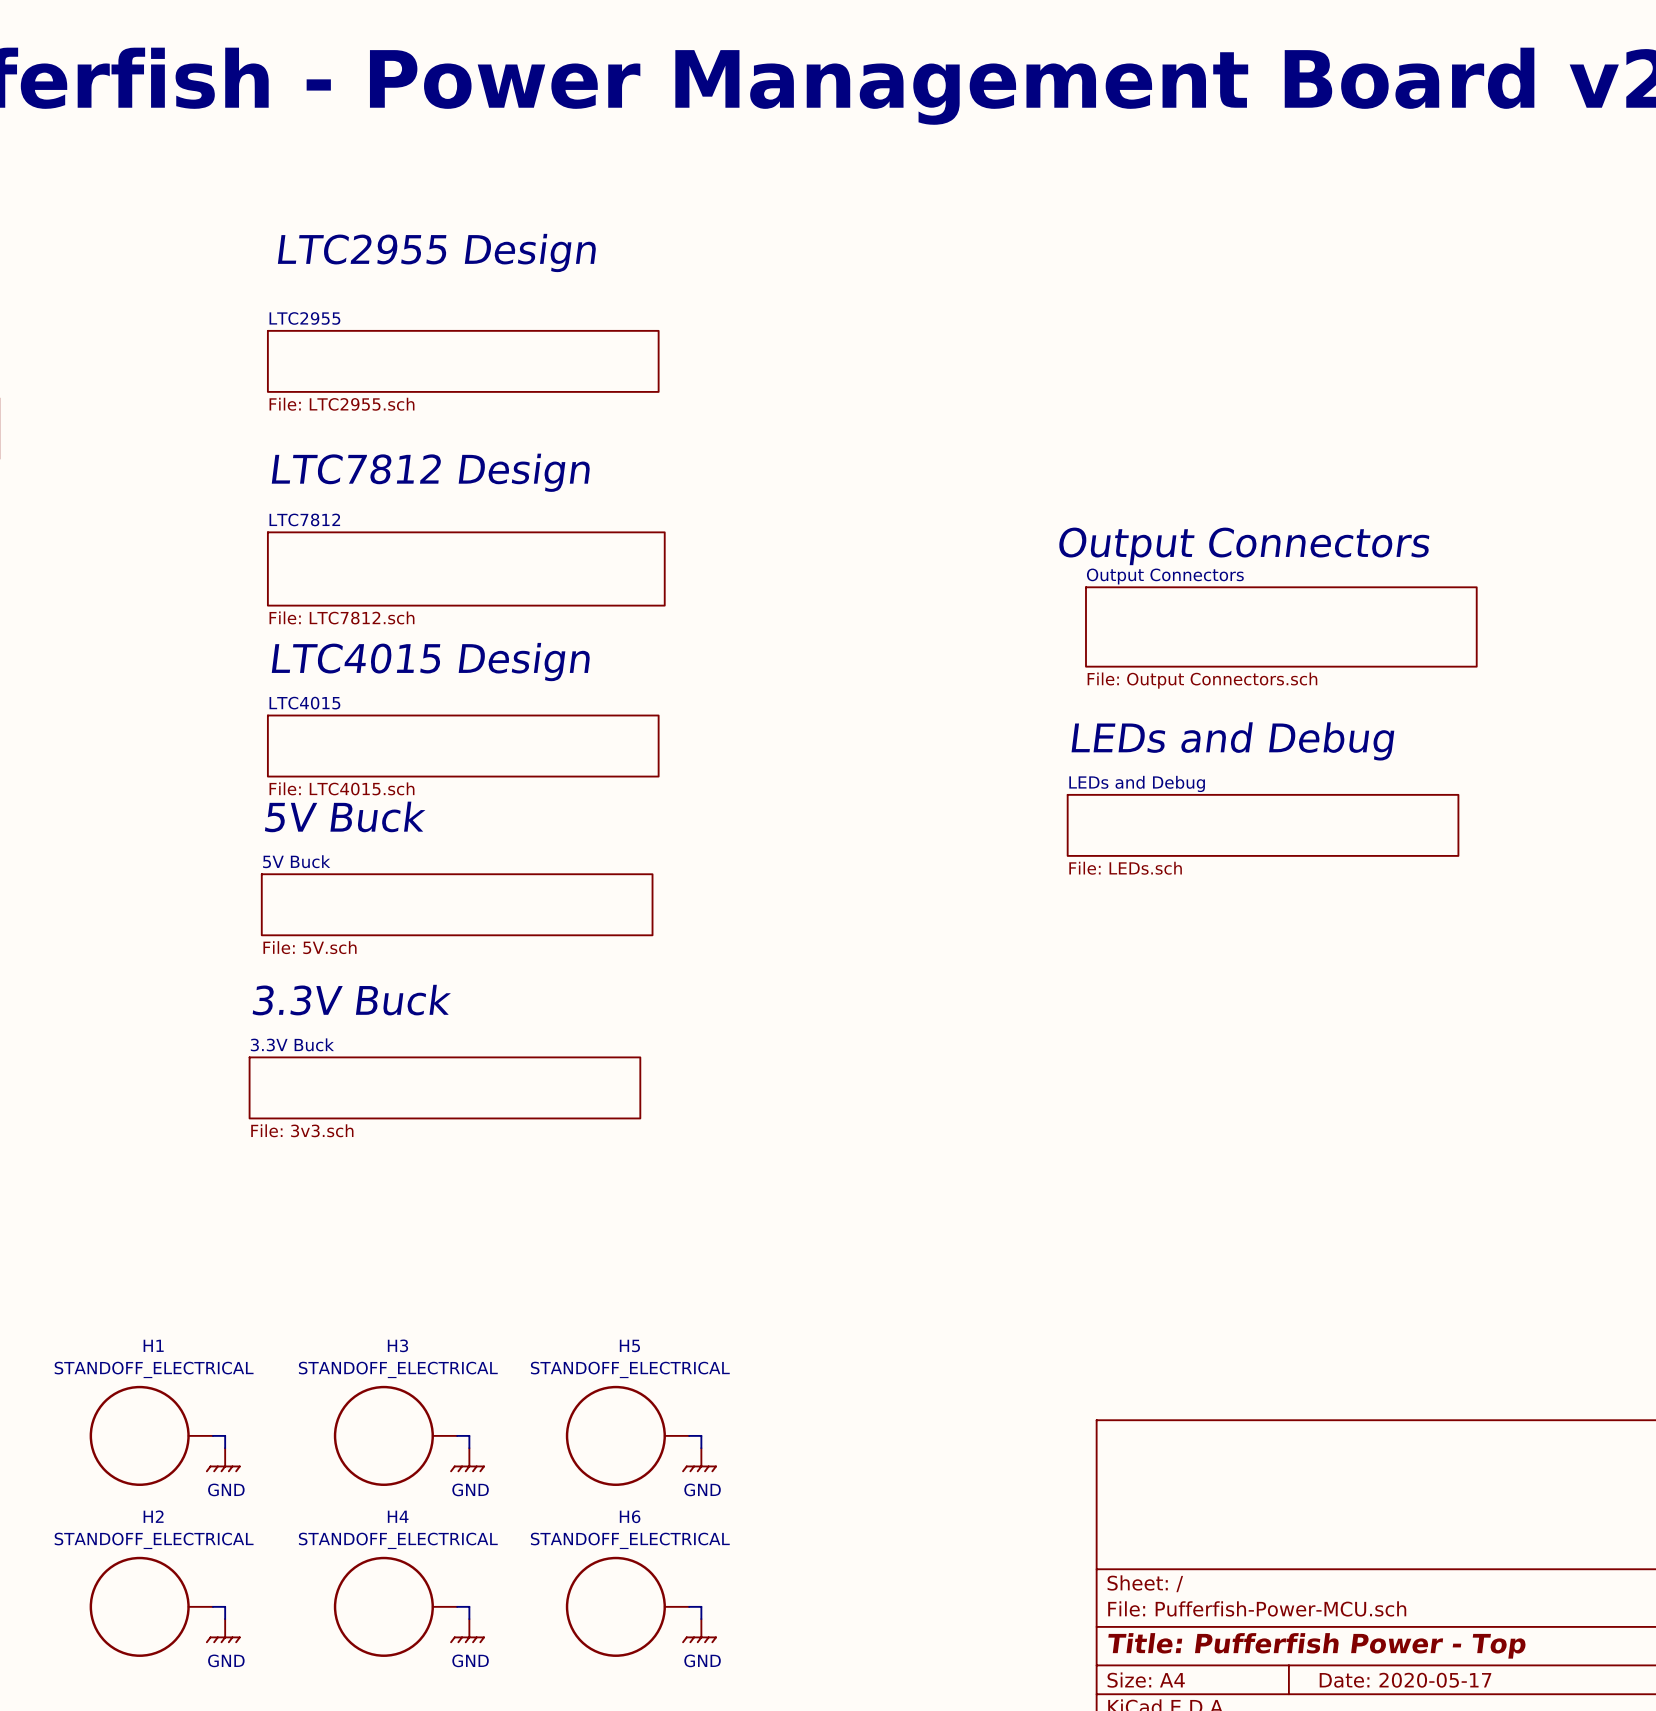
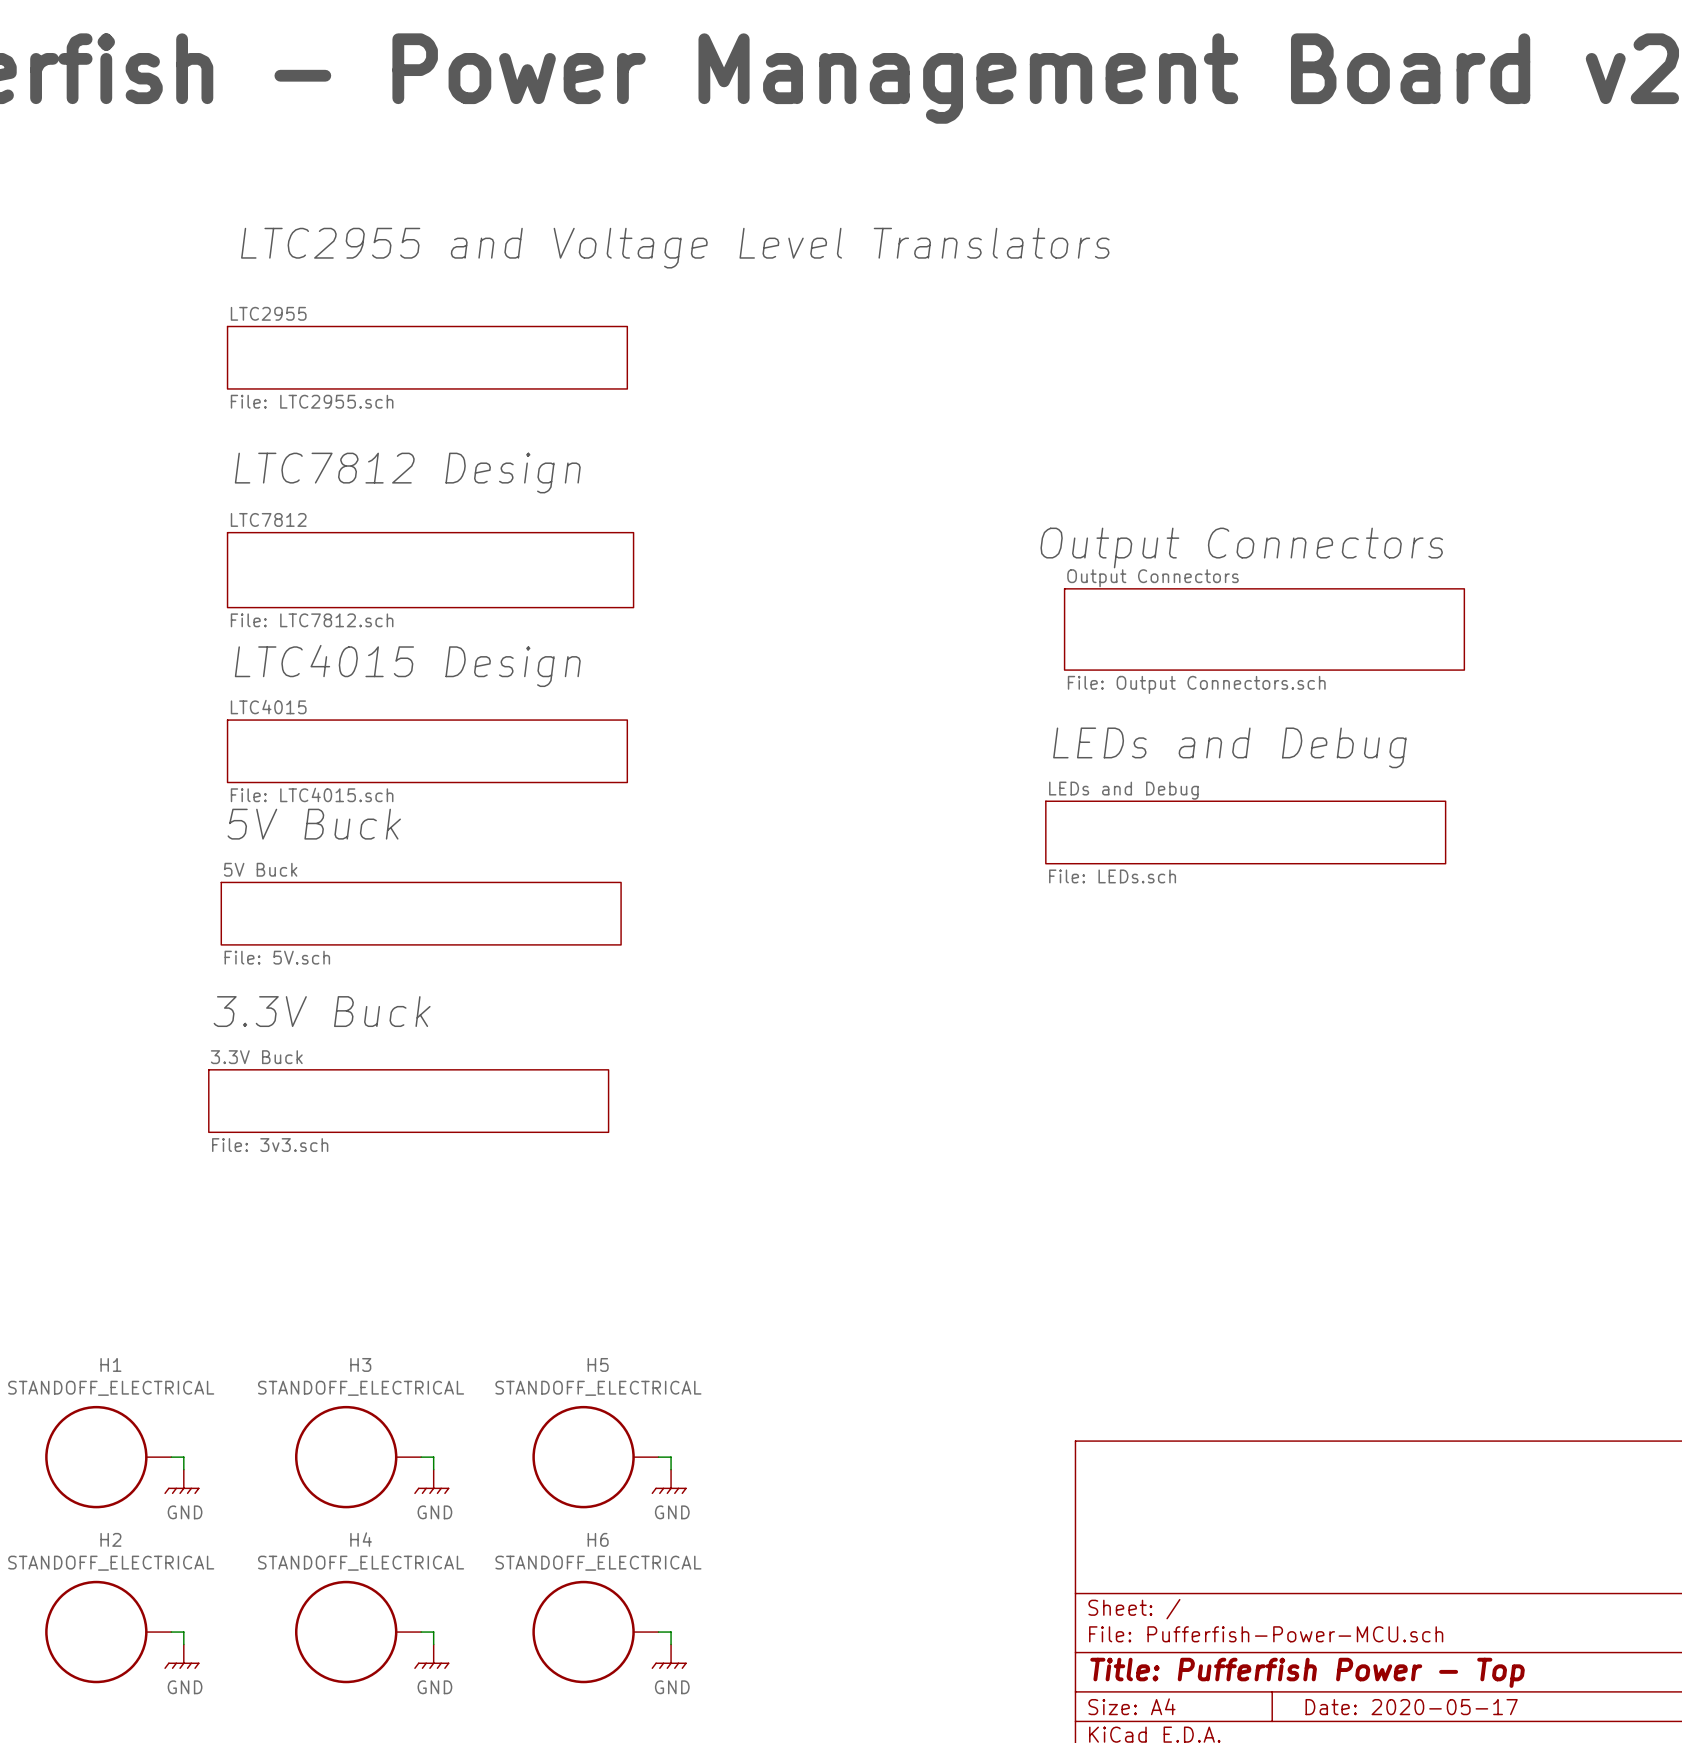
text: LTC2955 Design (437, 252) -> LTC2955 and Voltage Level Translators (675, 248)

